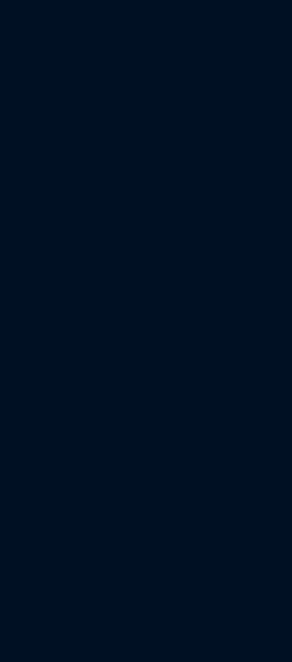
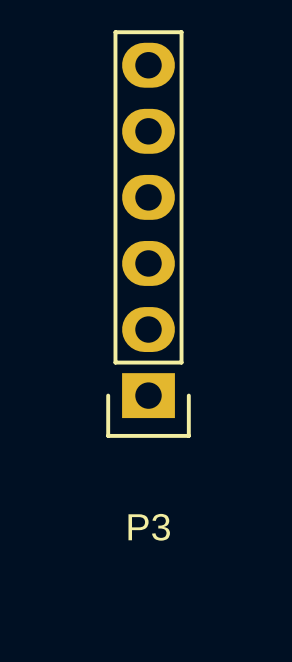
P3: none -> (148, 234)

